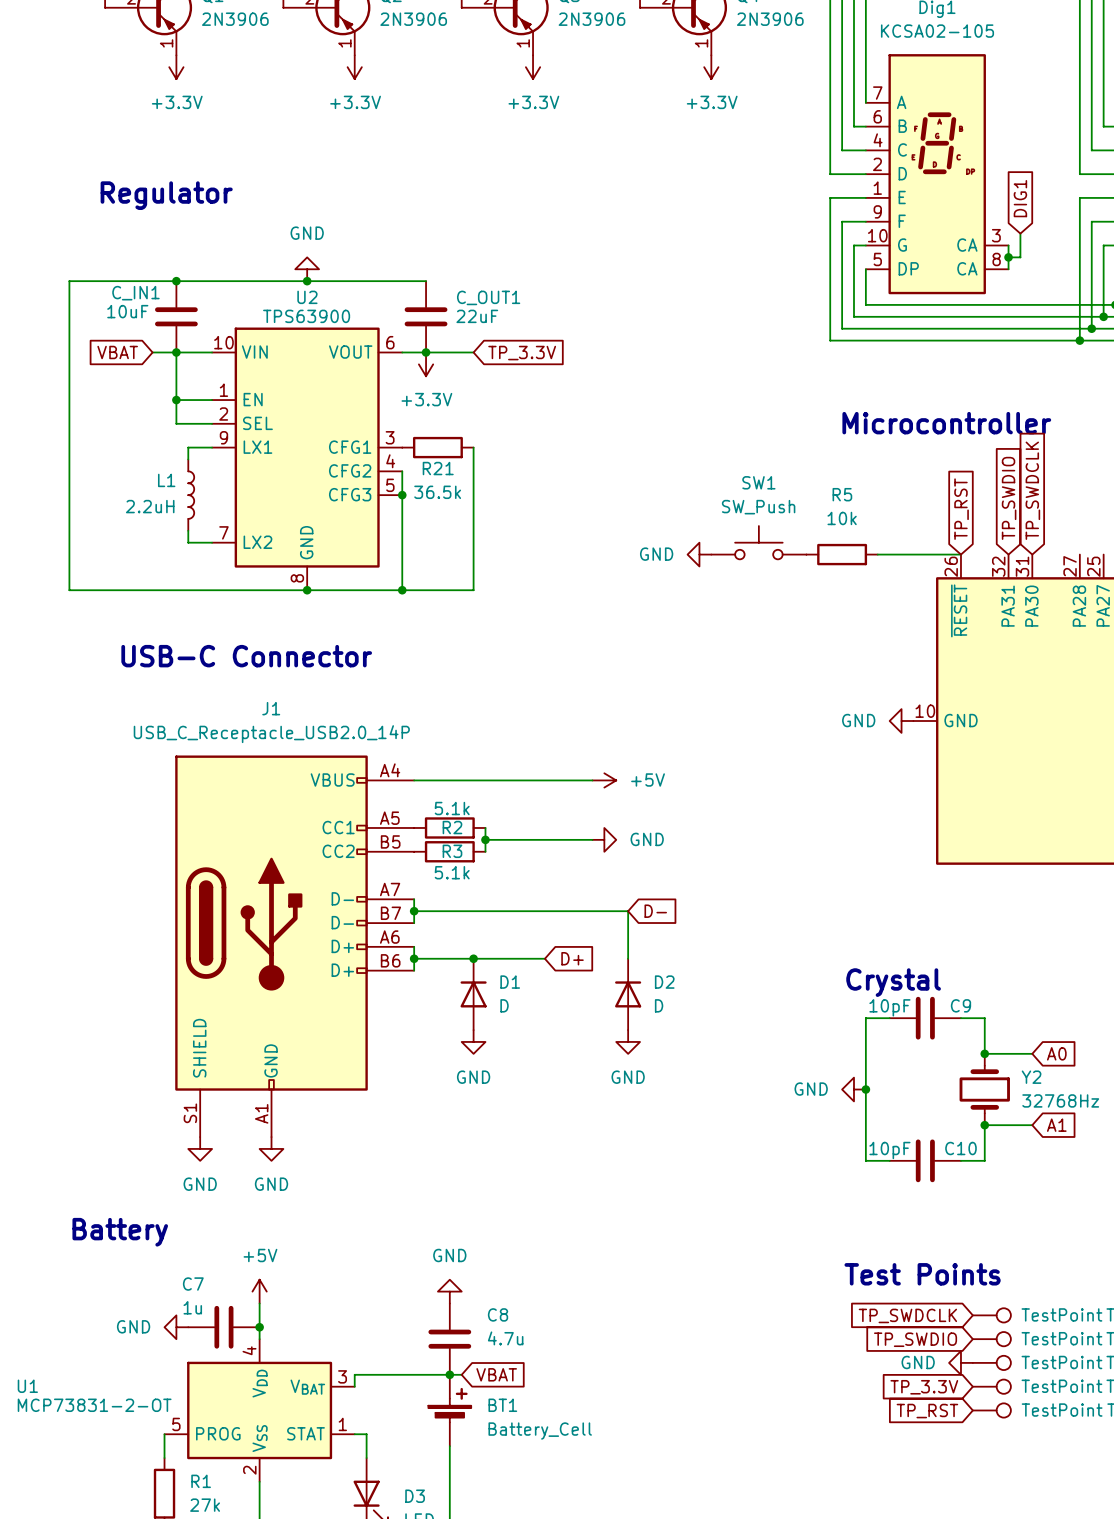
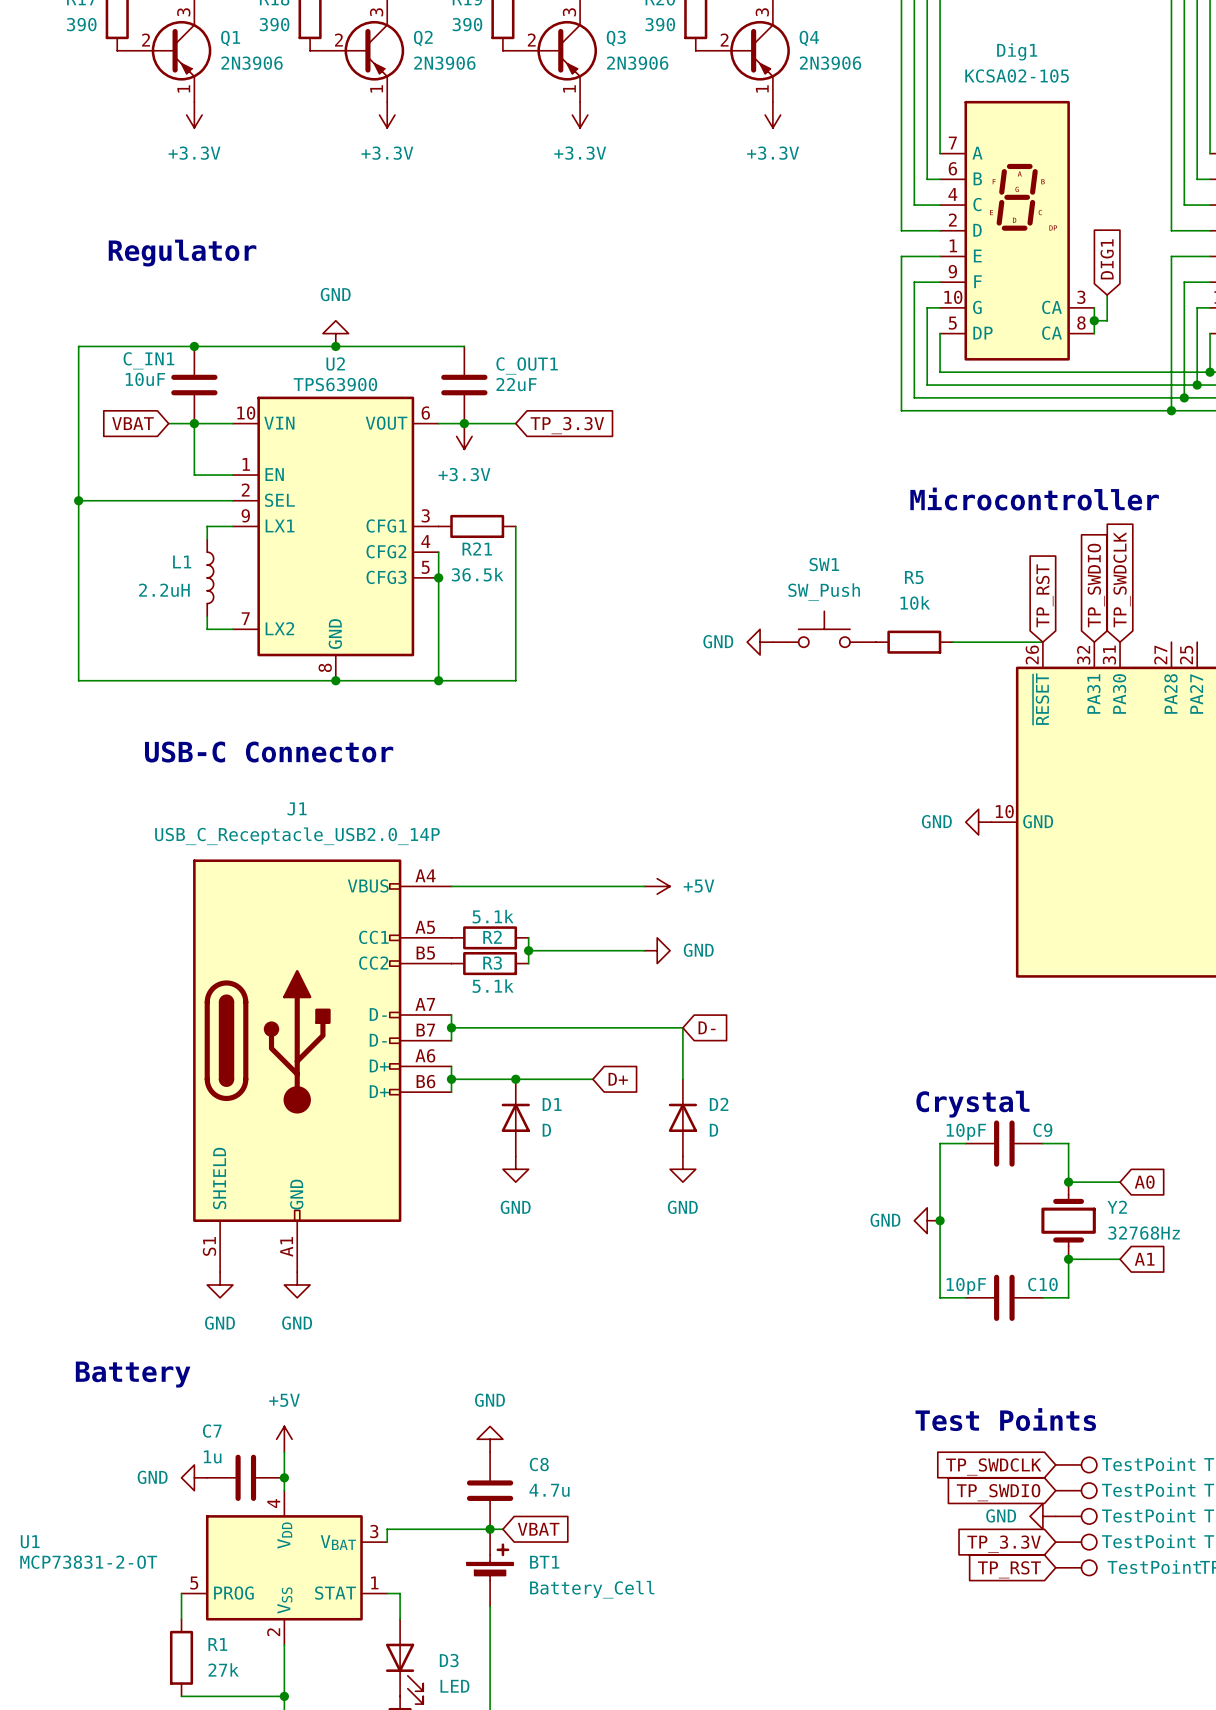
wire: (176, 400) (176, 423) -> (78, 500) (194, 500)
junction: (176, 400) -> none
junction: none -> (78, 500)

